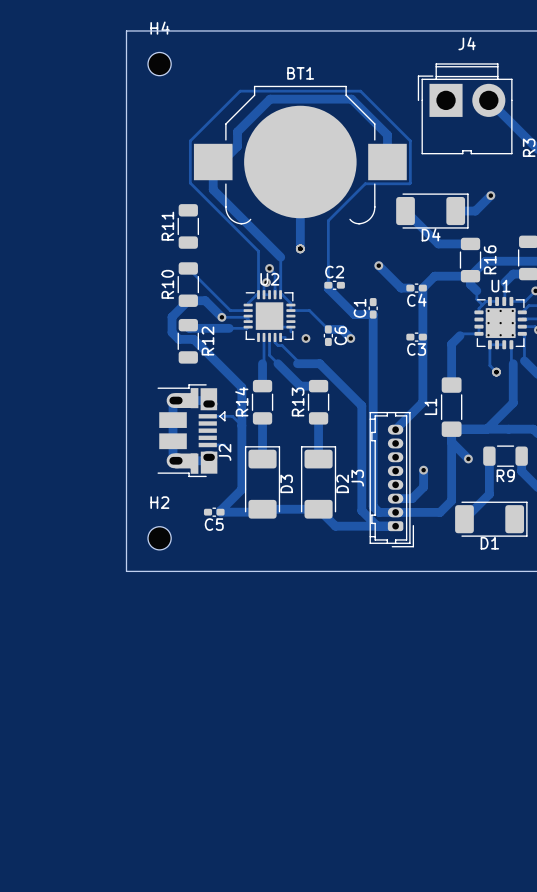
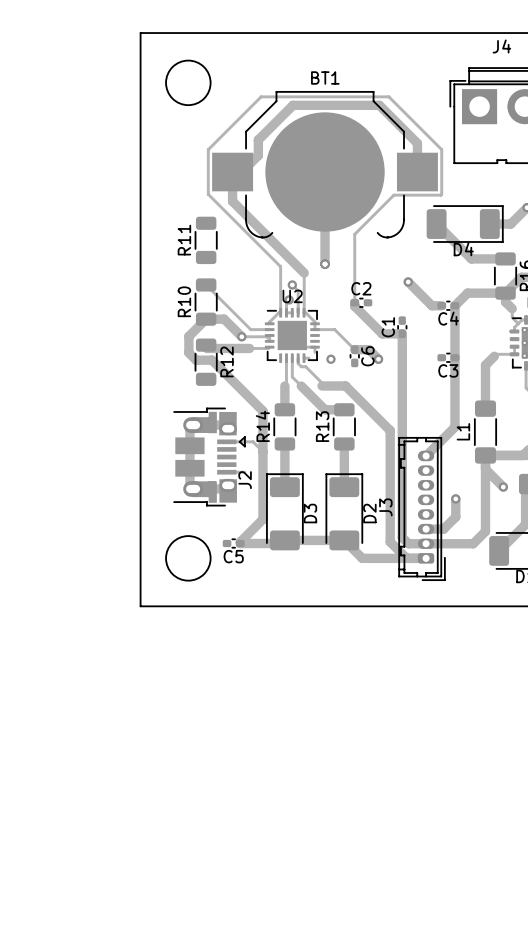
round board edge: none -> [165, 60, 211, 106]
H4: (159, 64) -> none
round board edge: none -> [165, 535, 211, 581]
H2: (159, 538) -> none

